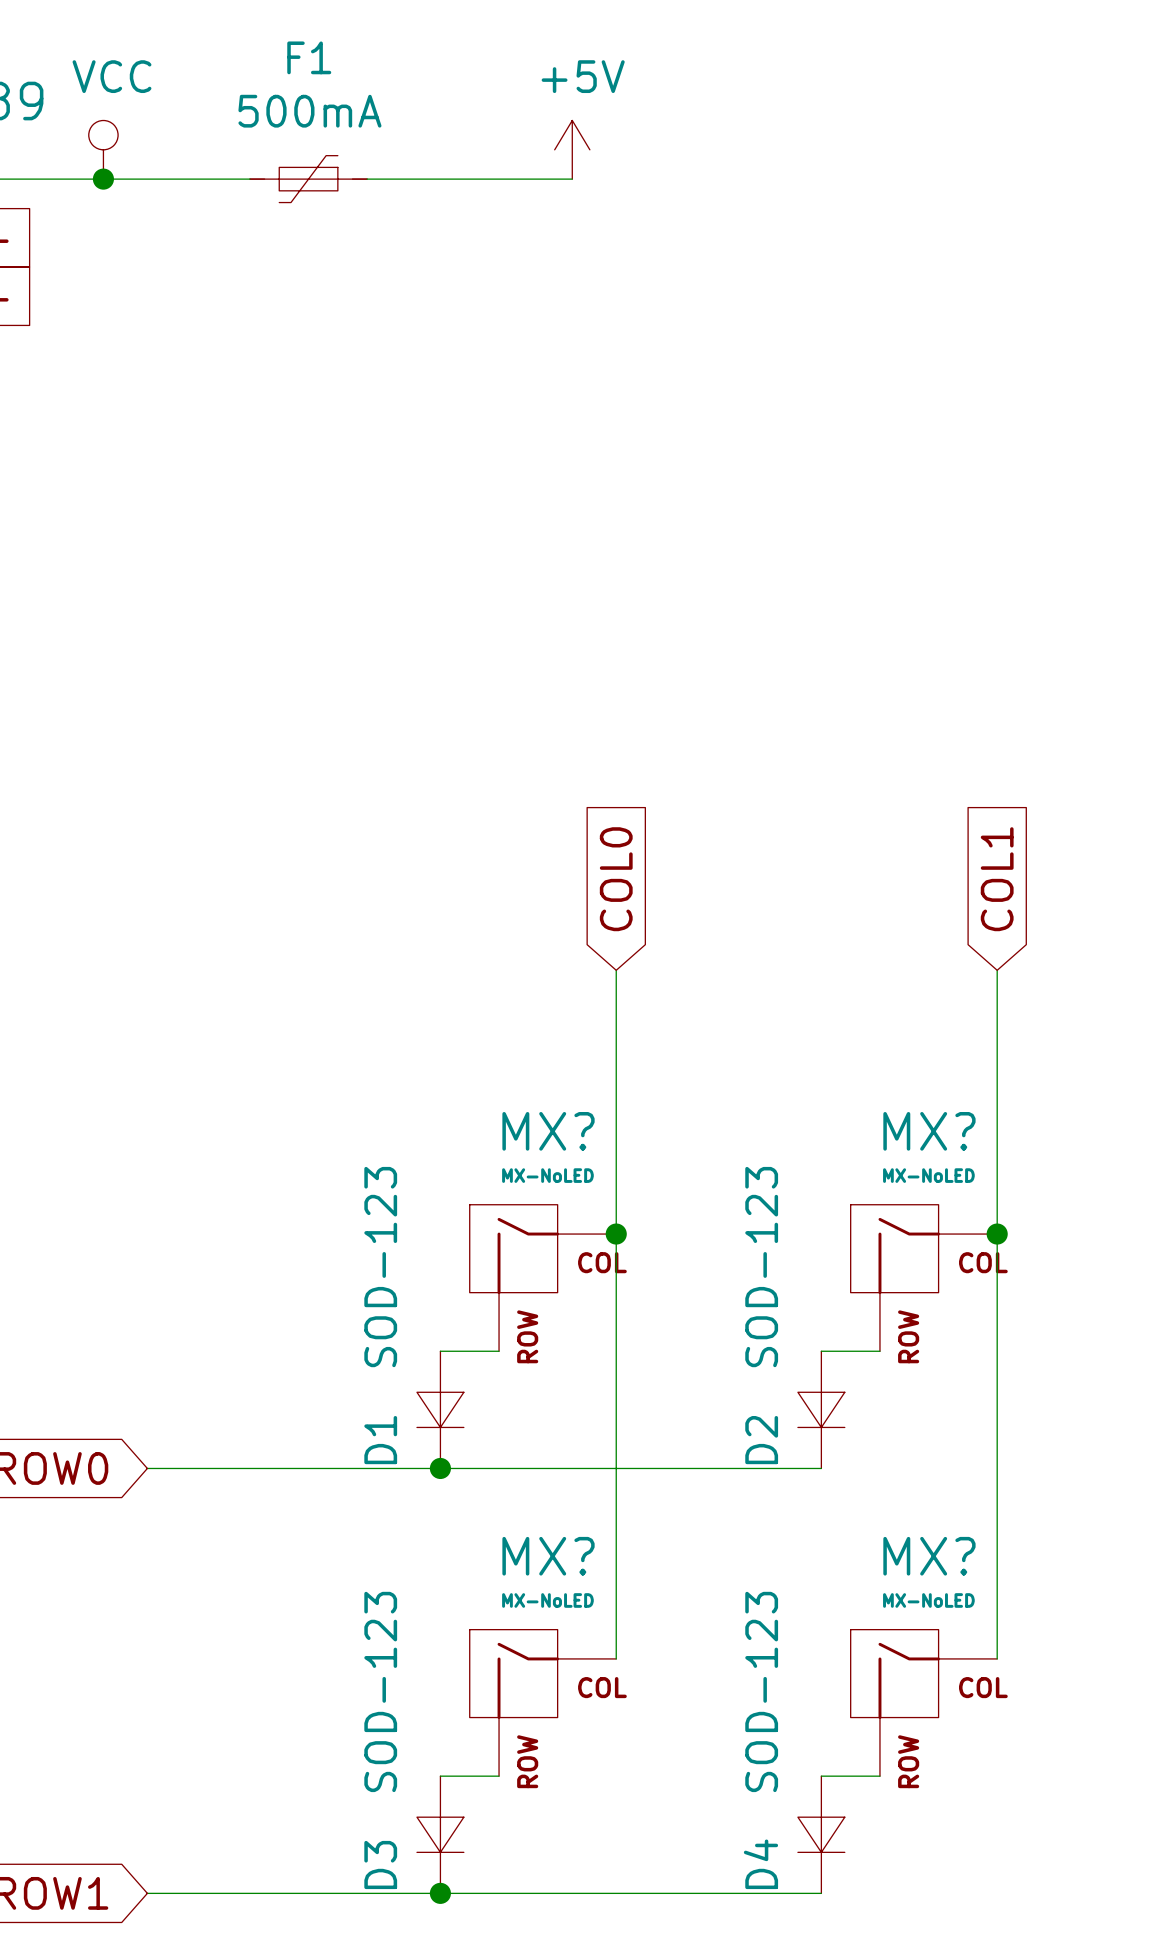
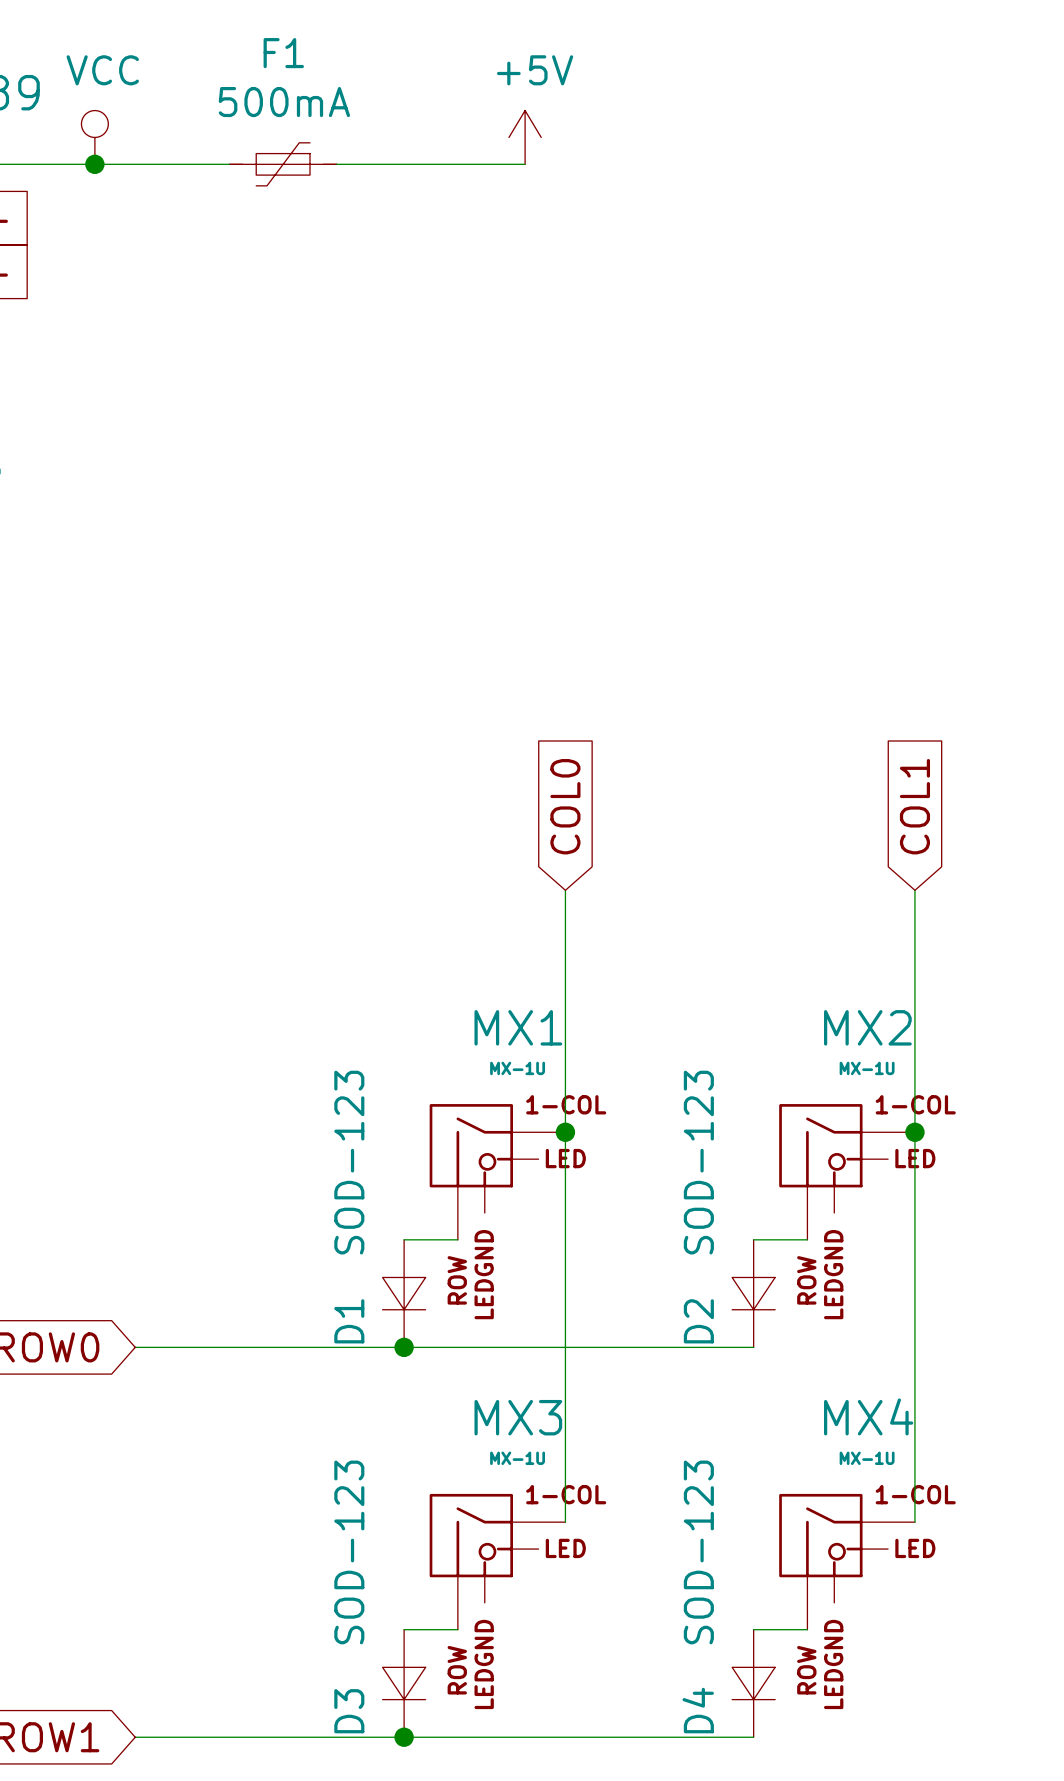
MX?: MX-NoLED (542, 1277) -> none
MX1: none -> MX-1U (497, 1171)
MX?: MX-NoLED (923, 1277) -> none
MX2: none -> MX-1U (847, 1171)
MX?: MX-NoLED (542, 1702) -> none
MX3: none -> MX-1U (497, 1561)
MX?: MX-NoLED (923, 1702) -> none
MX4: none -> MX-1U (847, 1561)

